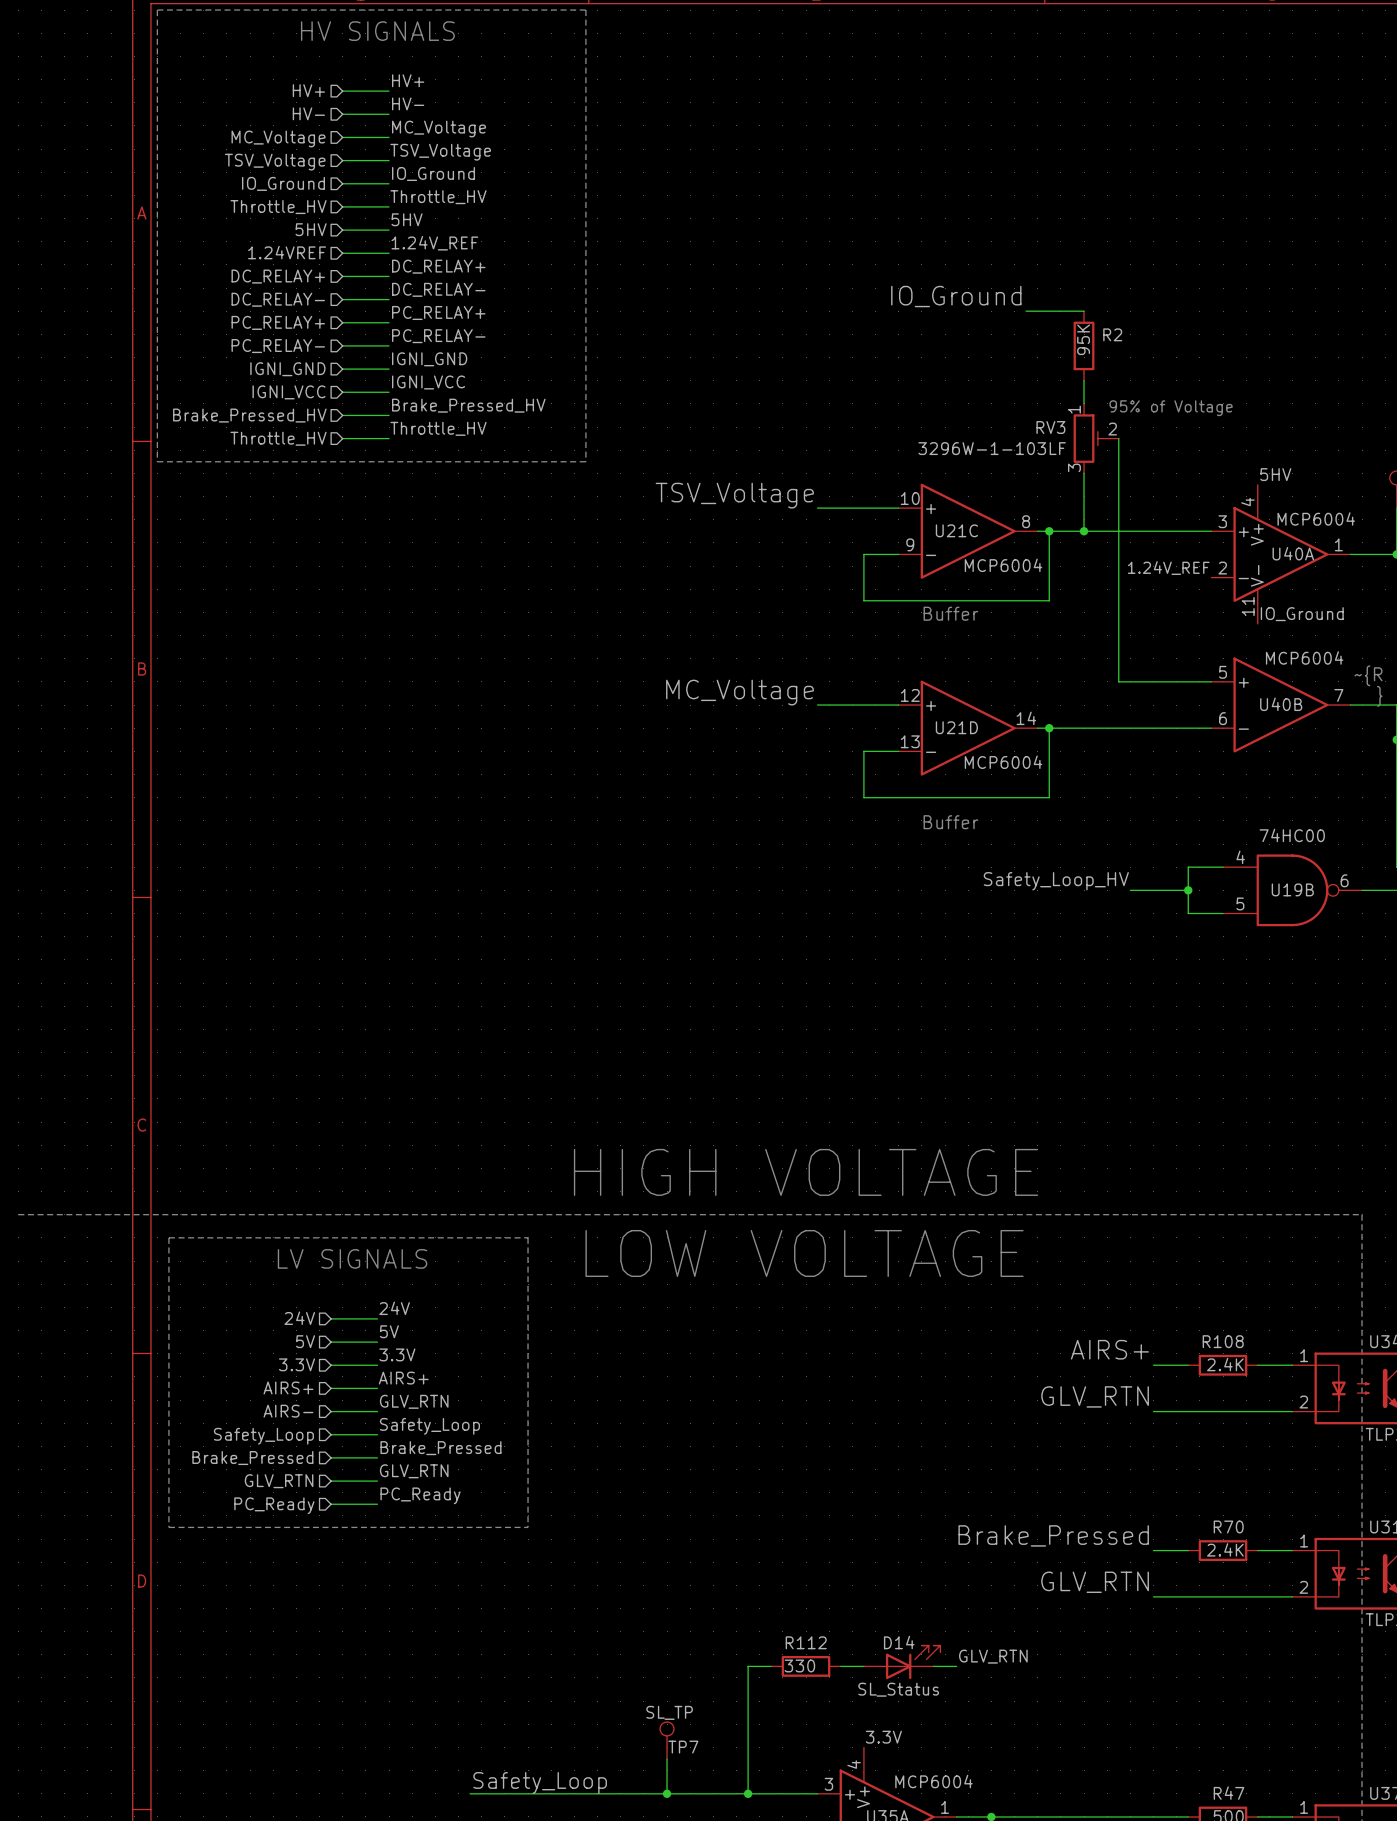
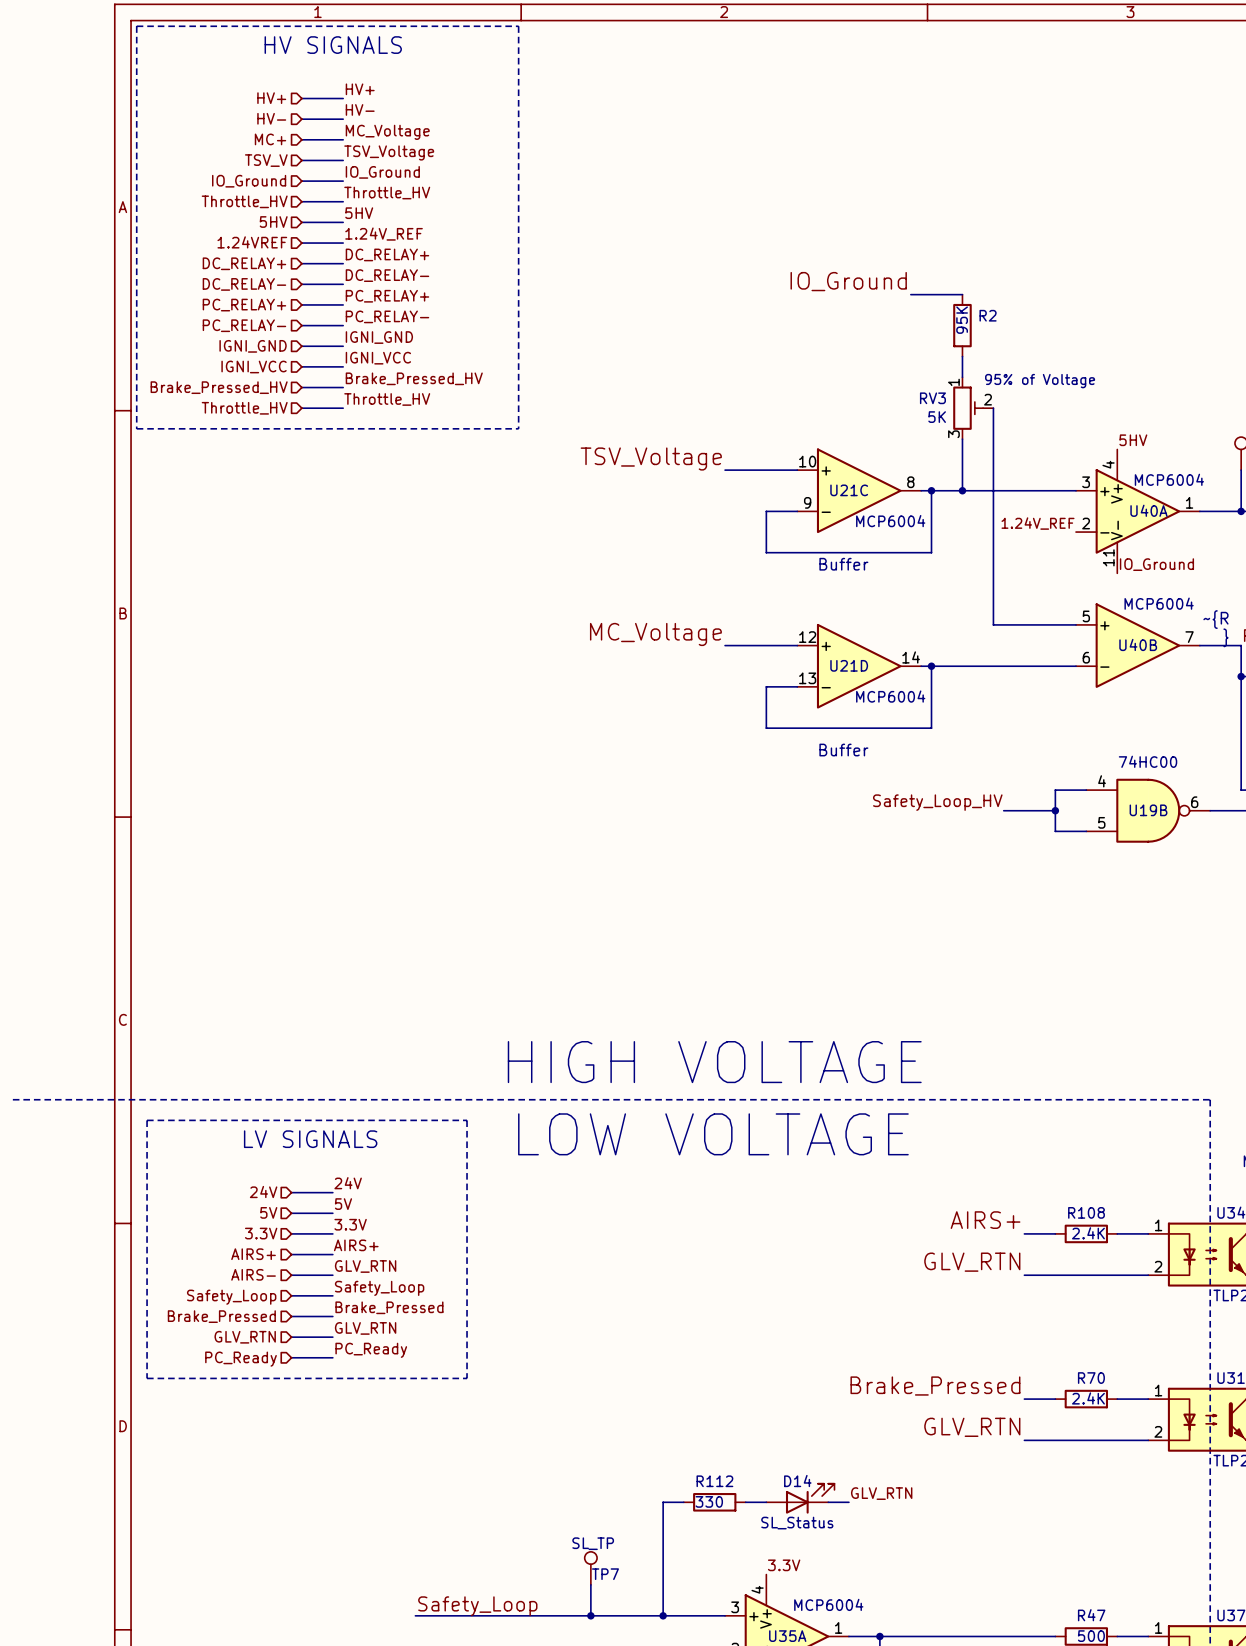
hierarchical label: MC_Voltage (278, 138) -> MC+ (270, 139)
hierarchical label: TSV_Voltage (275, 162) -> TSV_V (266, 160)
RV3 value: 3296W-1-103LF (992, 448) -> 5K (937, 417)

